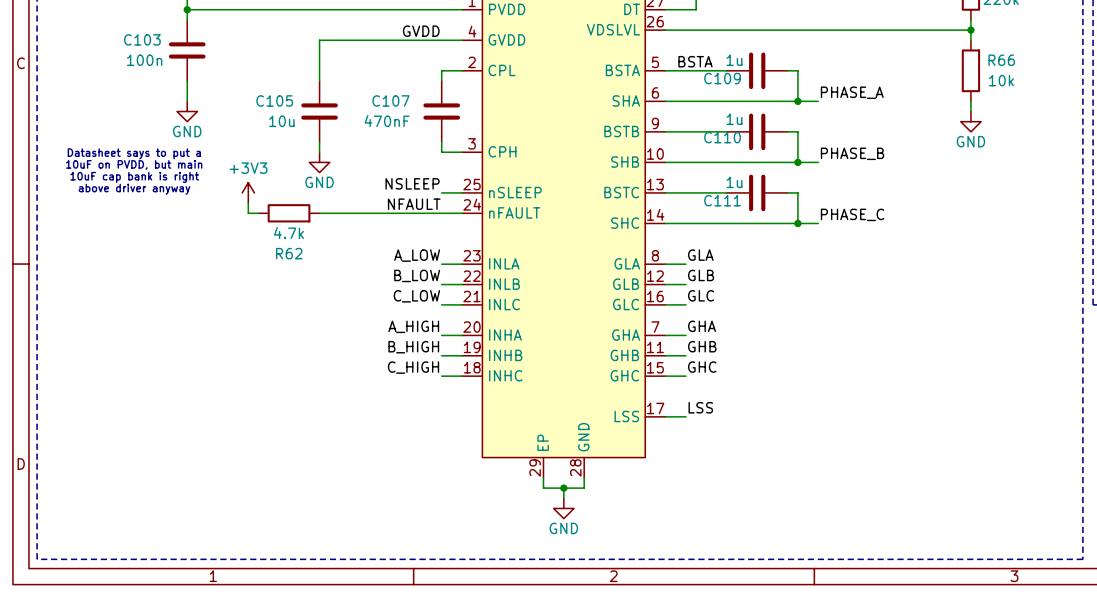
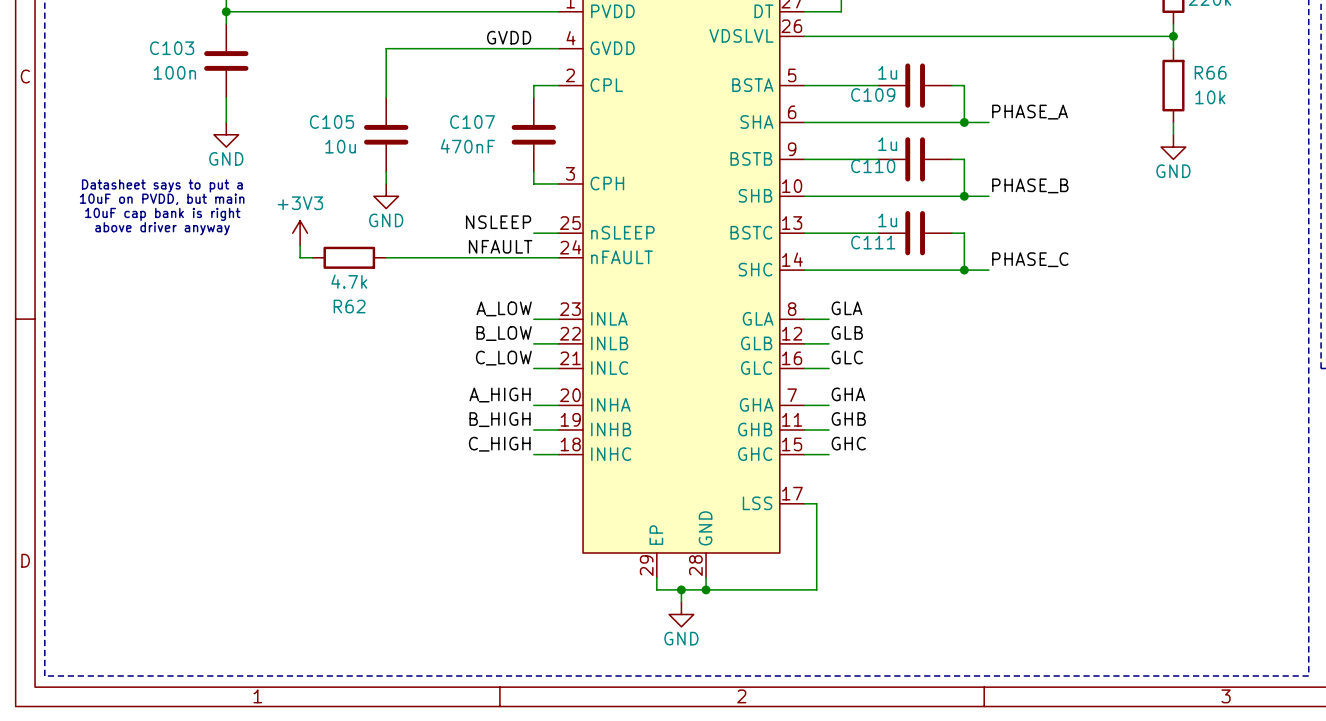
label: BSTA (695, 61) -> none
label: LSS (700, 407) -> none
wire: (675, 416) (685, 416) -> (816, 503) (816, 589) (706, 589)
junction: none -> (706, 589)

